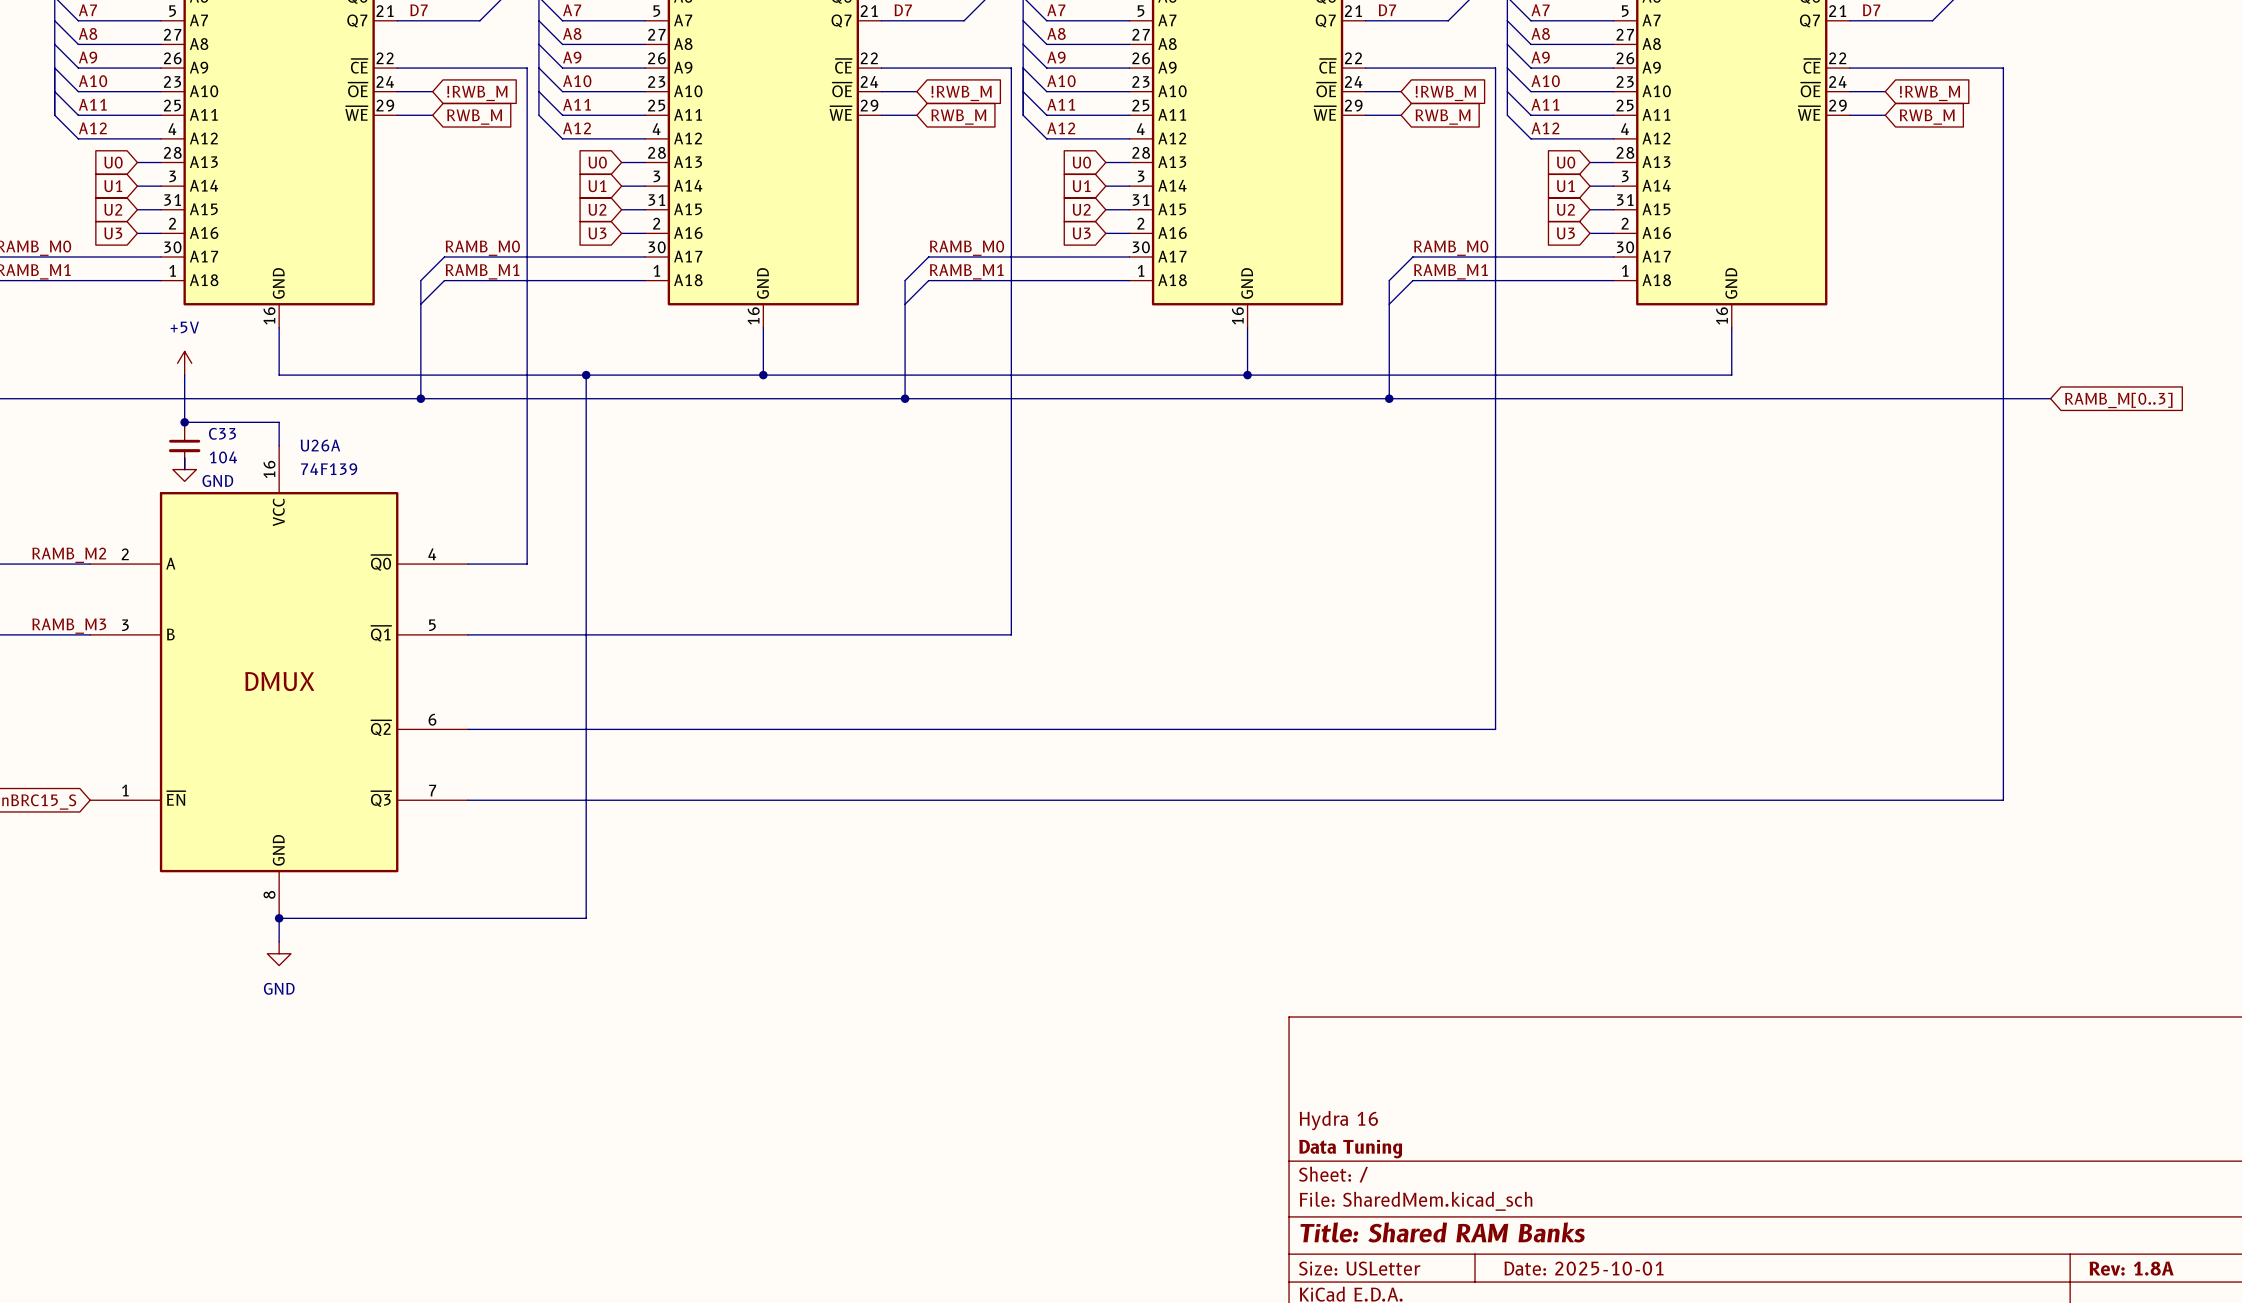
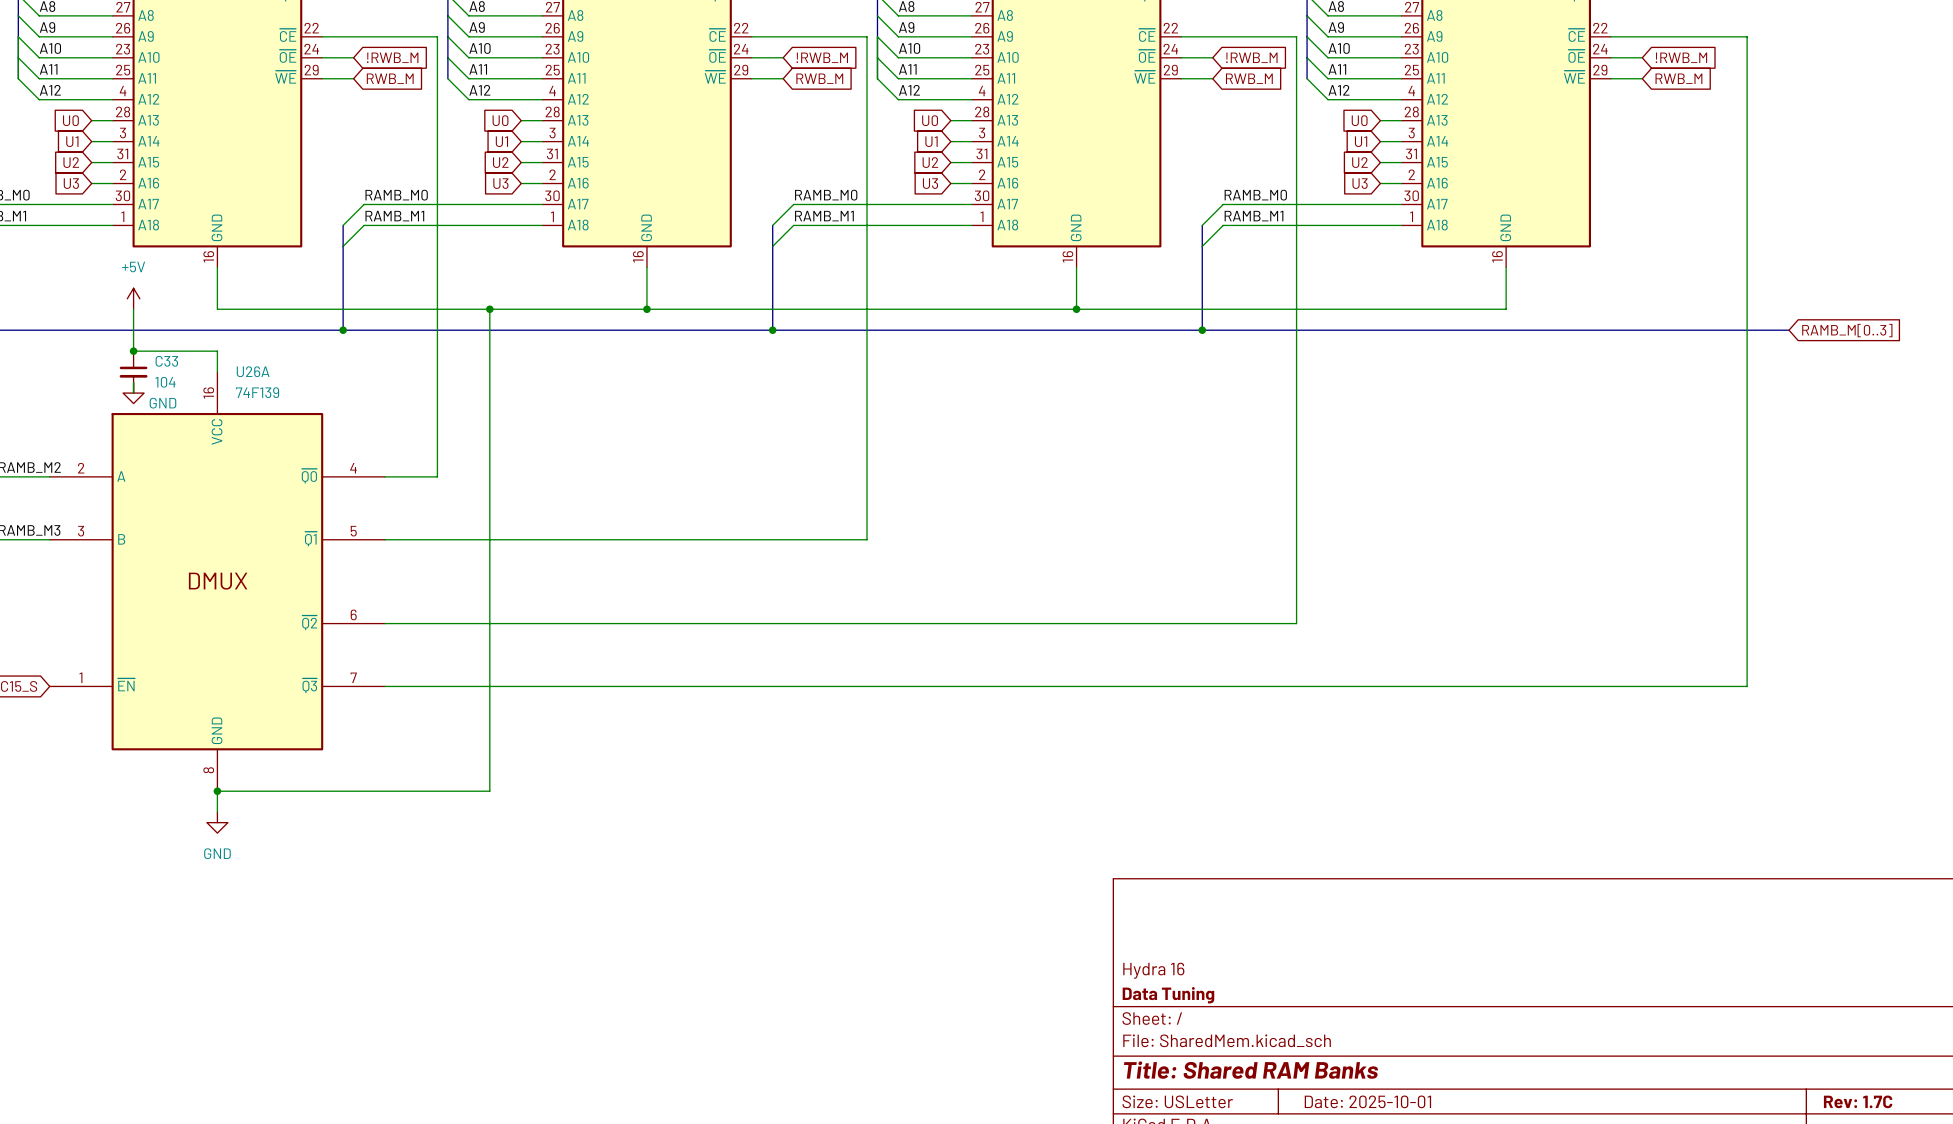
title block: Rev: 1.8A (2131, 1268) -> Rev: 1.7C (1858, 1101)

